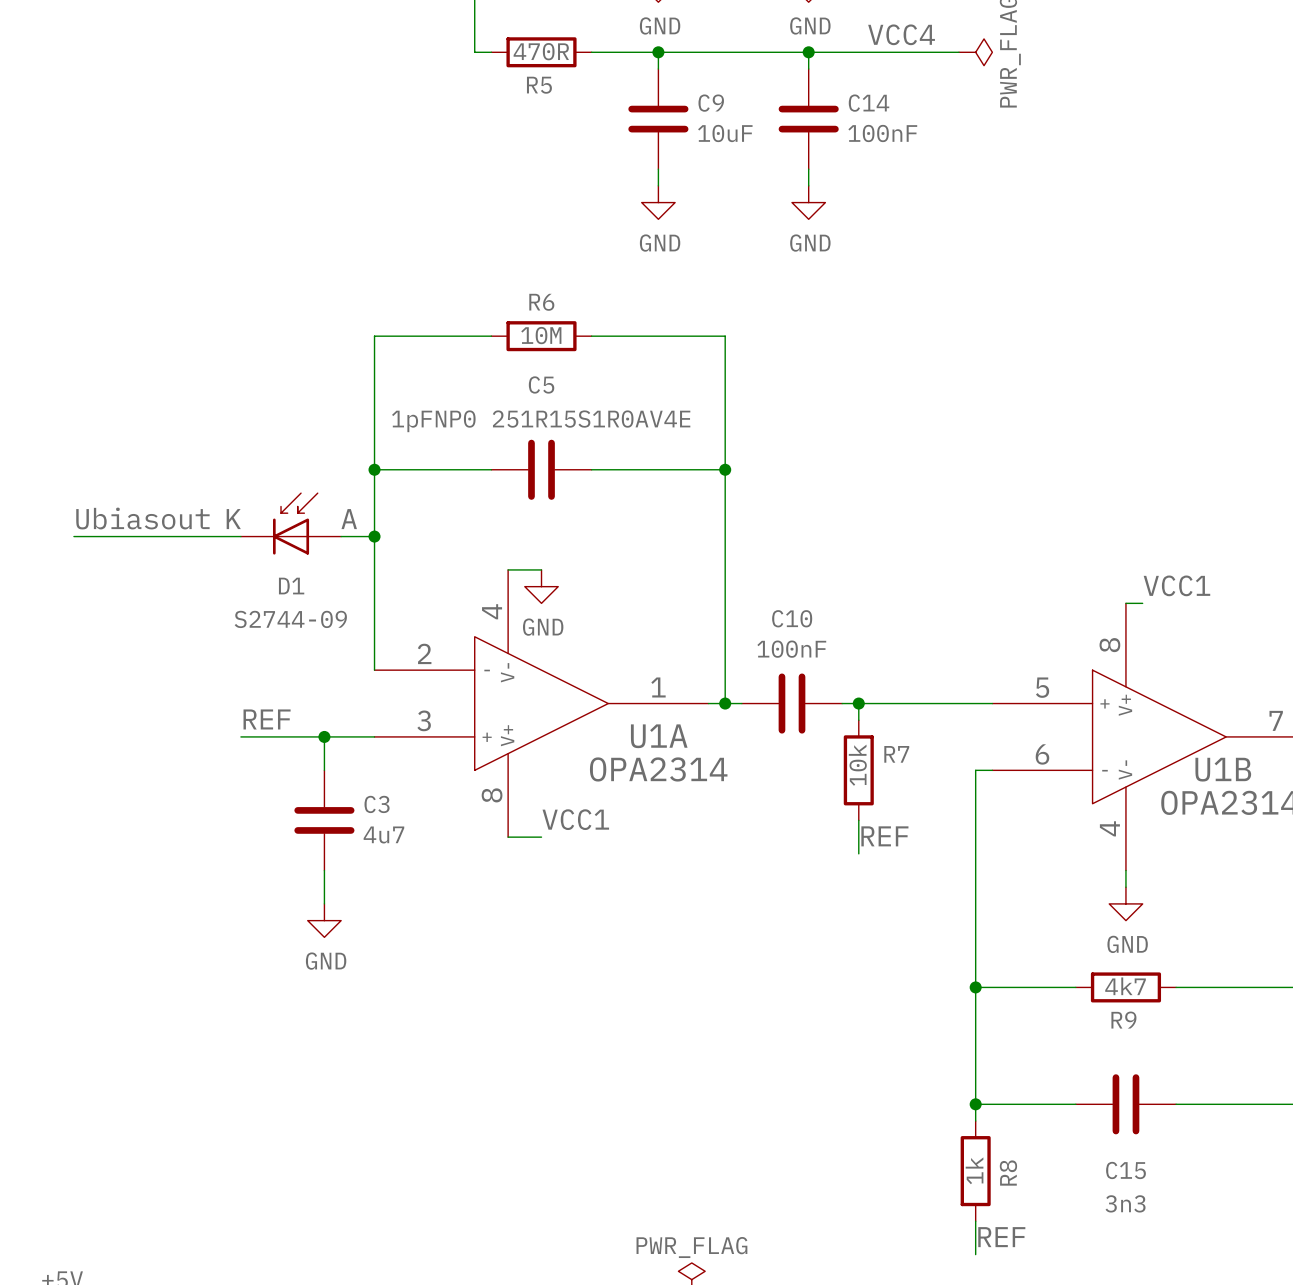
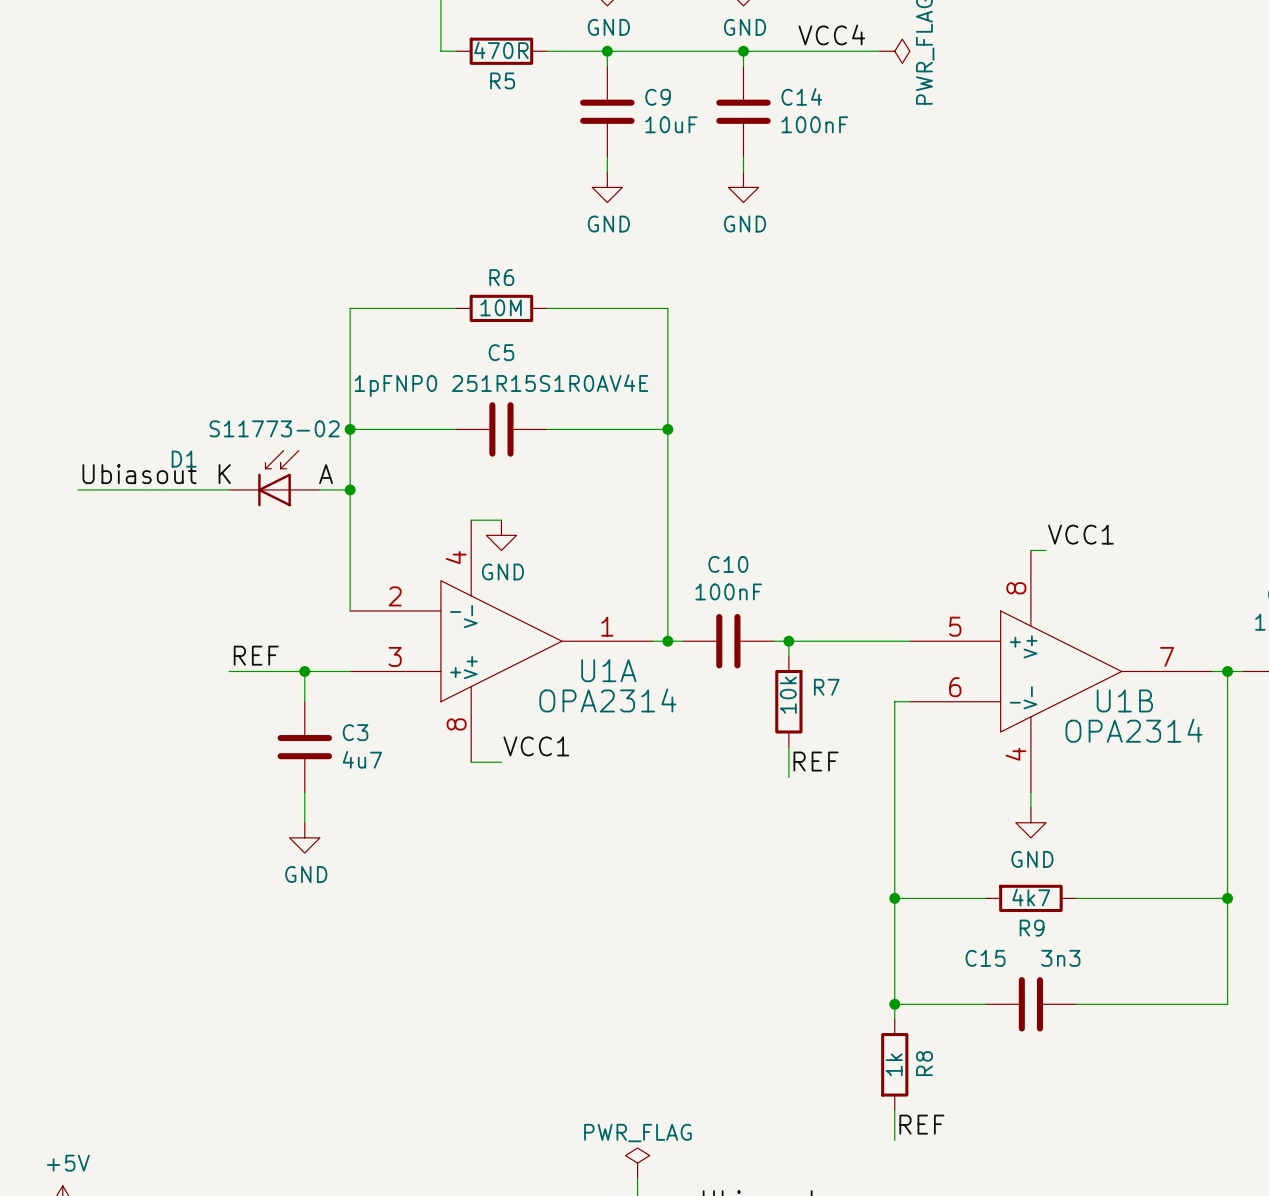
D1 name position: D1 (291, 586) -> D1 (184, 459)
D1 value: S2744-09 (290, 619) -> S11773-02 (274, 428)
C15 name position: C15 (1126, 1170) -> C15 (985, 958)
C15 value position: 3n3 (1125, 1203) -> 3n3 (1060, 958)

